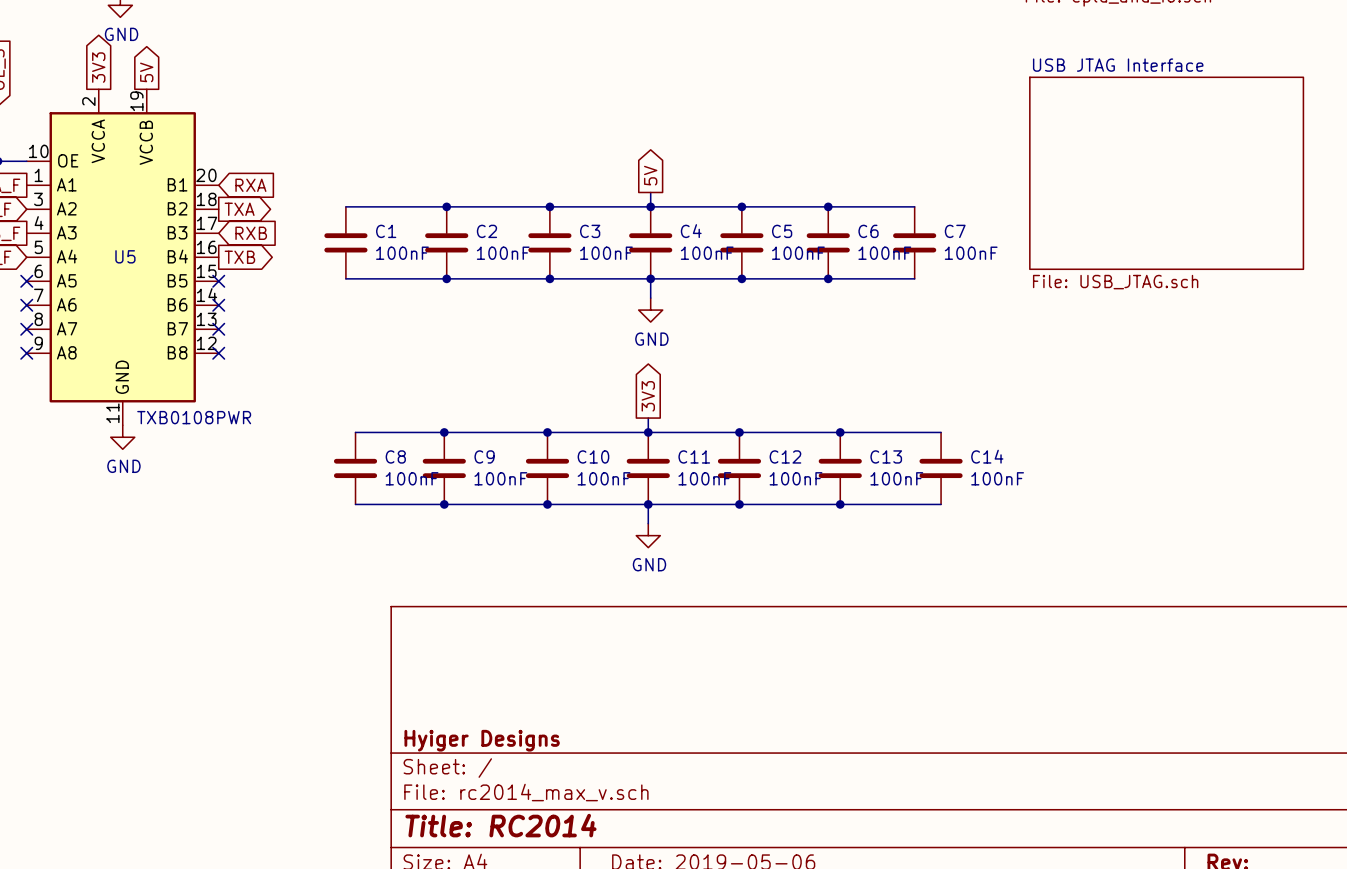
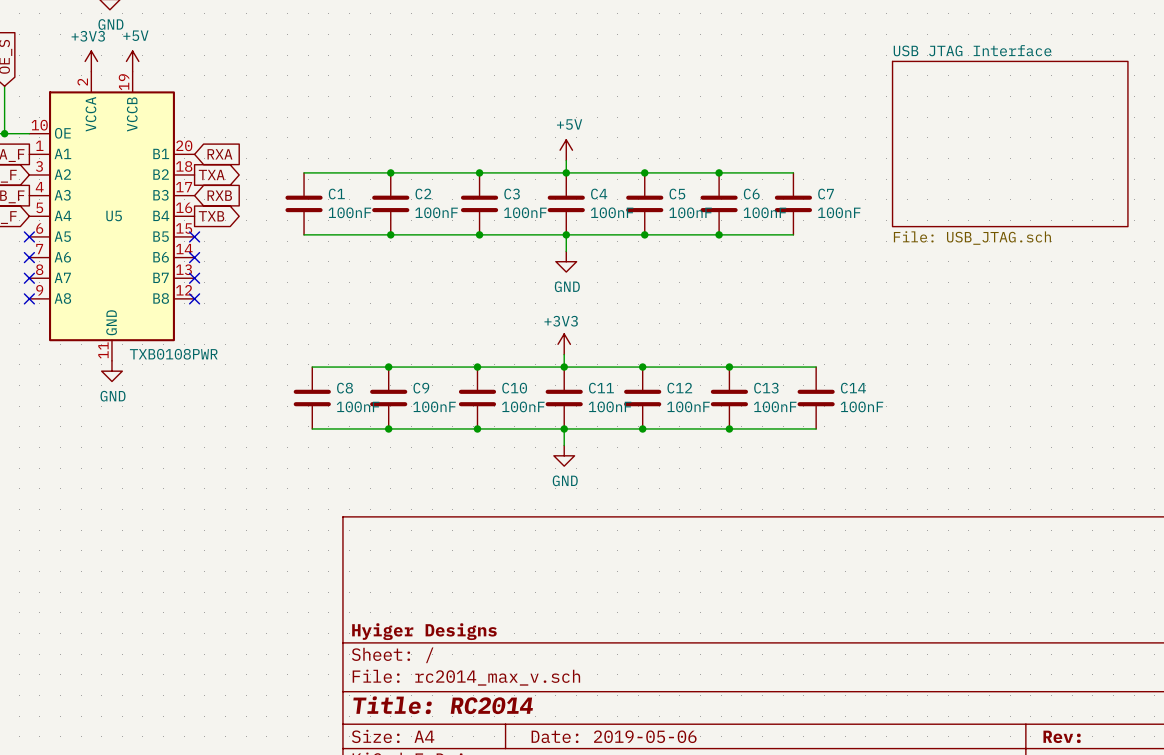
global label: 3V3 (98, 67) -> none
global label: 5V (146, 72) -> none
power symbol: none -> +3V3 (91, 61)
power symbol: none -> +5V (132, 61)
global label: 5V (650, 175) -> none
power symbol: none -> +5V (566, 150)
global label: 3V3 (648, 396) -> none
power symbol: none -> +3V3 (564, 344)

